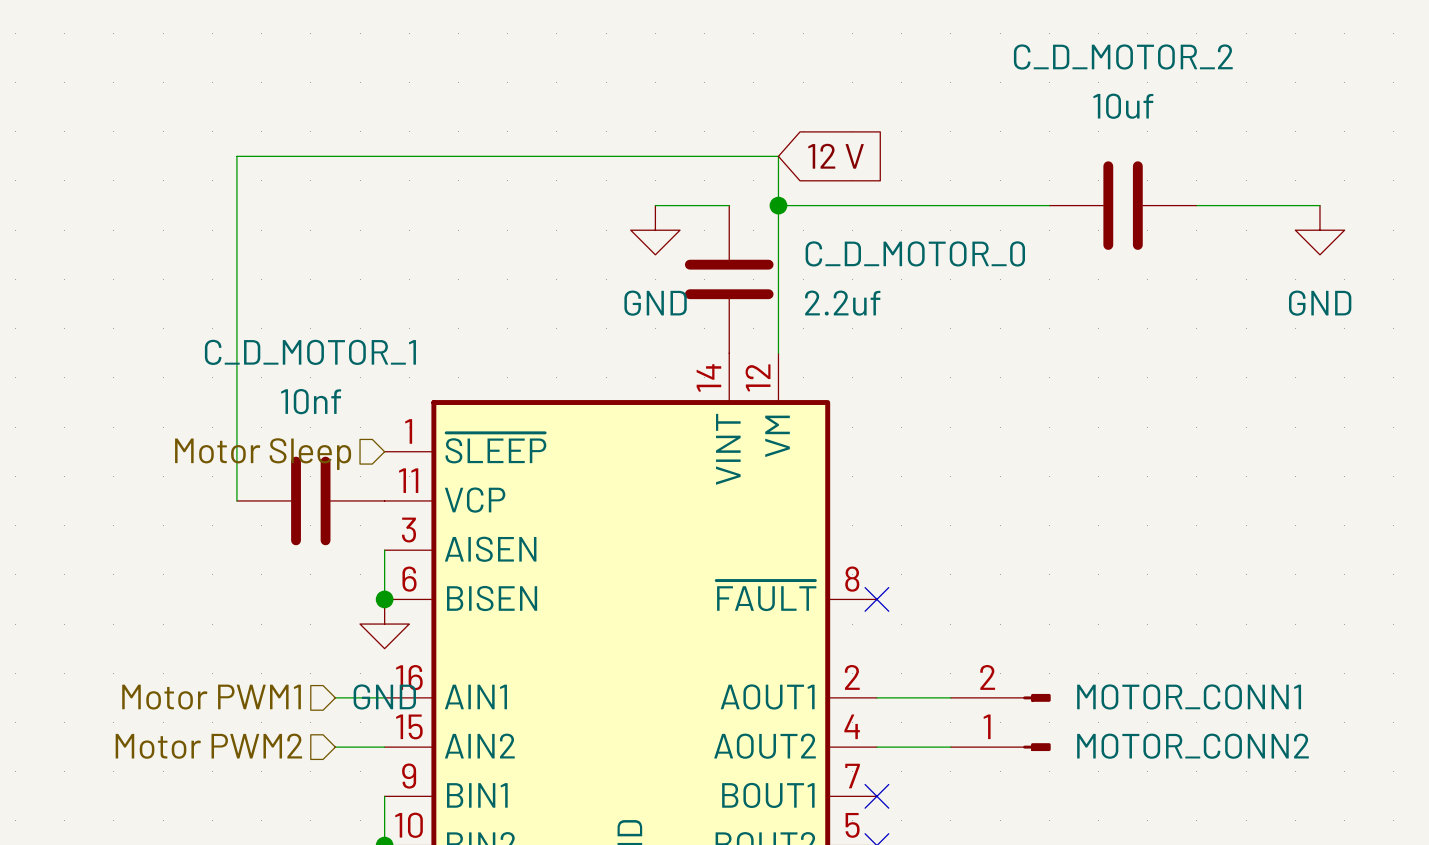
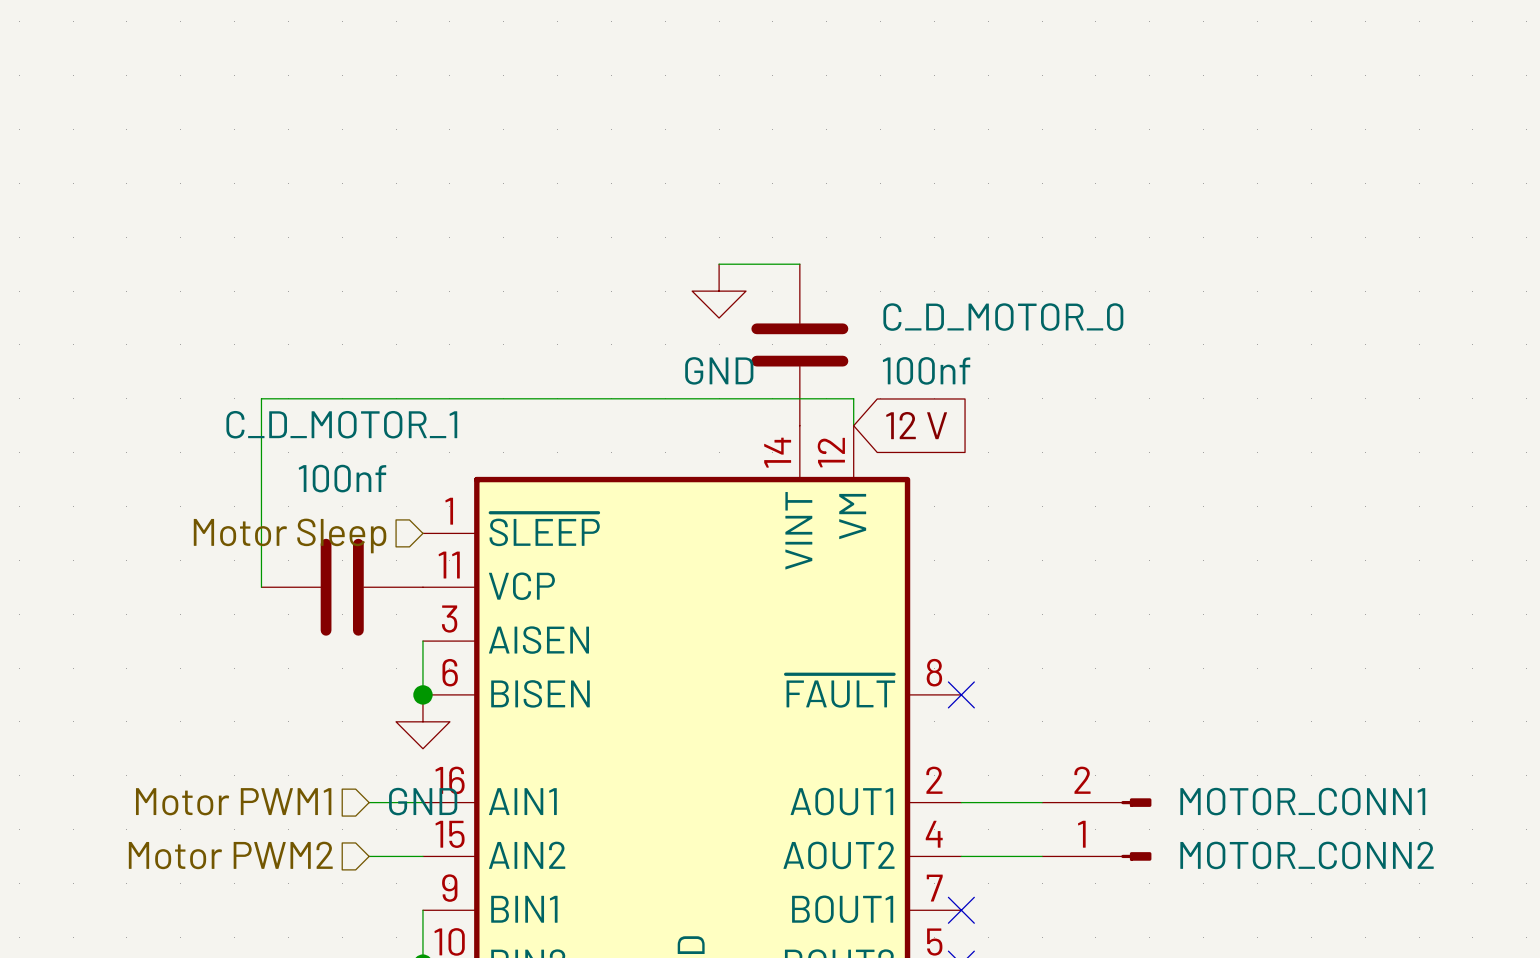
global label position: 12 V (836, 156) -> 12 V (916, 425)
wire: (778, 205) (1049, 205) -> none
junction: (778, 205) -> none
C_D_MOTOR_2: 10uf (1123, 205) -> none
wire: (1196, 205) (1319, 205) -> none
power symbol: GND (1319, 230) -> none
C_D_MOTOR_0 value: 2.2uf (842, 303) -> 100nf (926, 370)
wire: (236, 328) (236, 156) (778, 156) (778, 328) -> (261, 398) (853, 398)
C_D_MOTOR_1 value: 10nf (311, 401) -> 100nf (342, 478)

